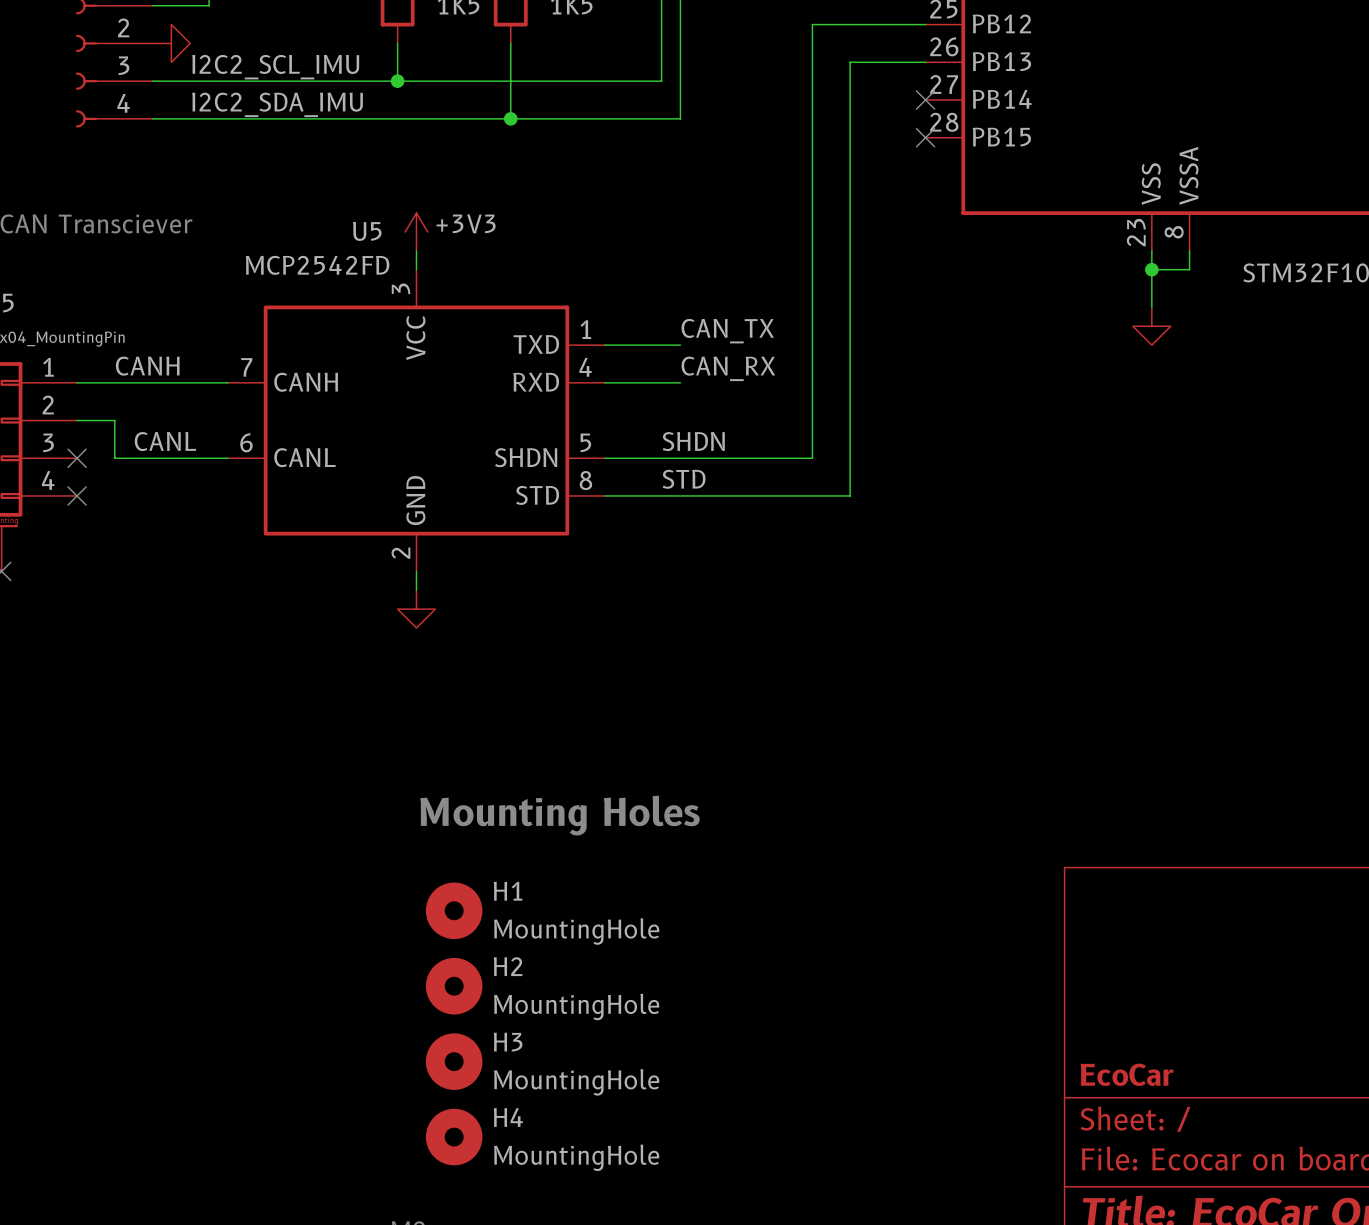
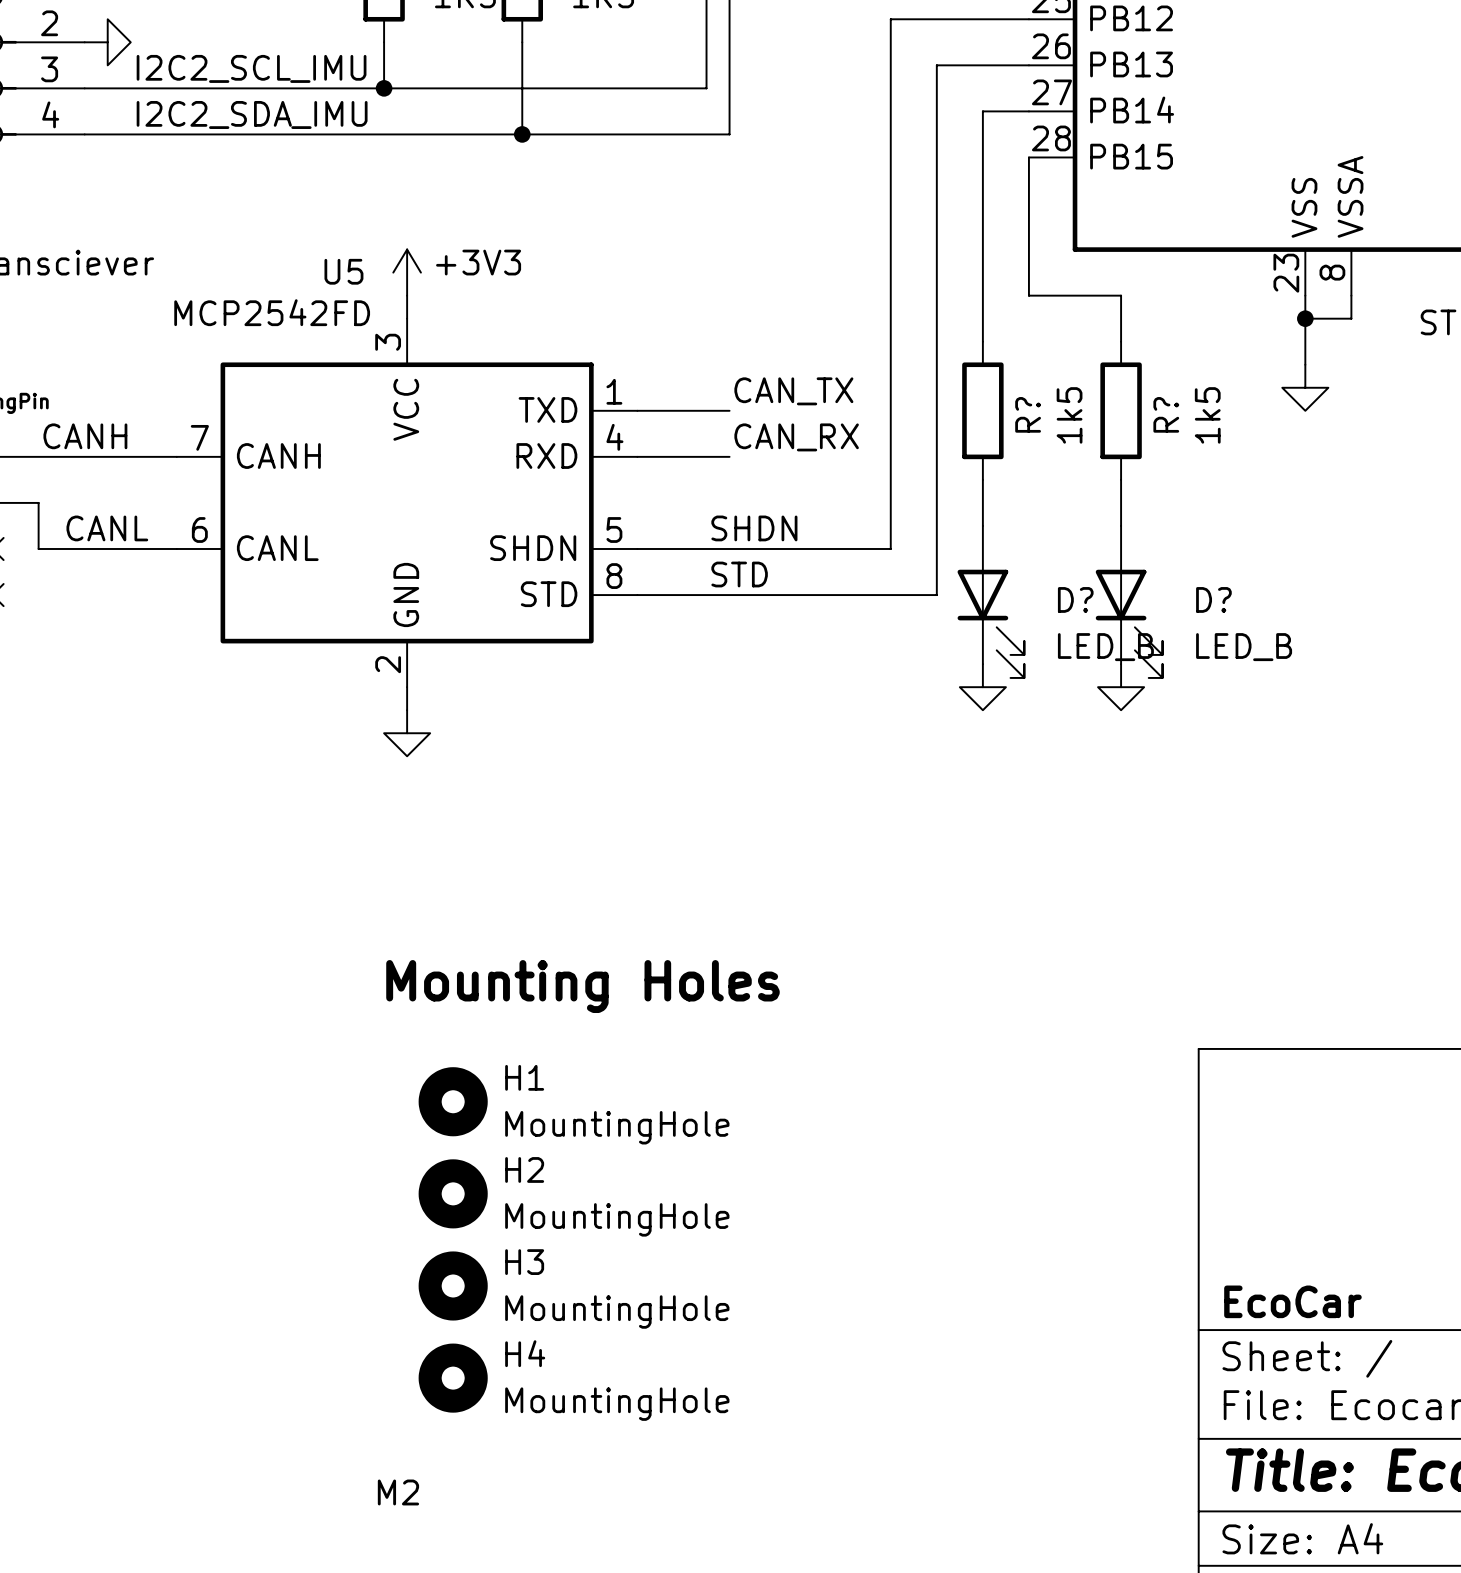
wire: none -> (1028, 111) (982, 111) (982, 341)
no-connect mark: (925, 100) -> none
wire: none -> (1028, 157) (1028, 295) (1121, 295) (1121, 341)
no-connect mark: (925, 137) -> none
R?: none -> 1k5 (982, 410)
R?: none -> 1k5 (1121, 410)
wire: none -> (982, 479) (982, 525)
wire: none -> (1121, 479) (1121, 525)
D?: none -> LED_B (990, 601)
D?: none -> LED_B (1129, 601)
power symbol: none -> (982, 687)
power symbol: none -> (1121, 687)

